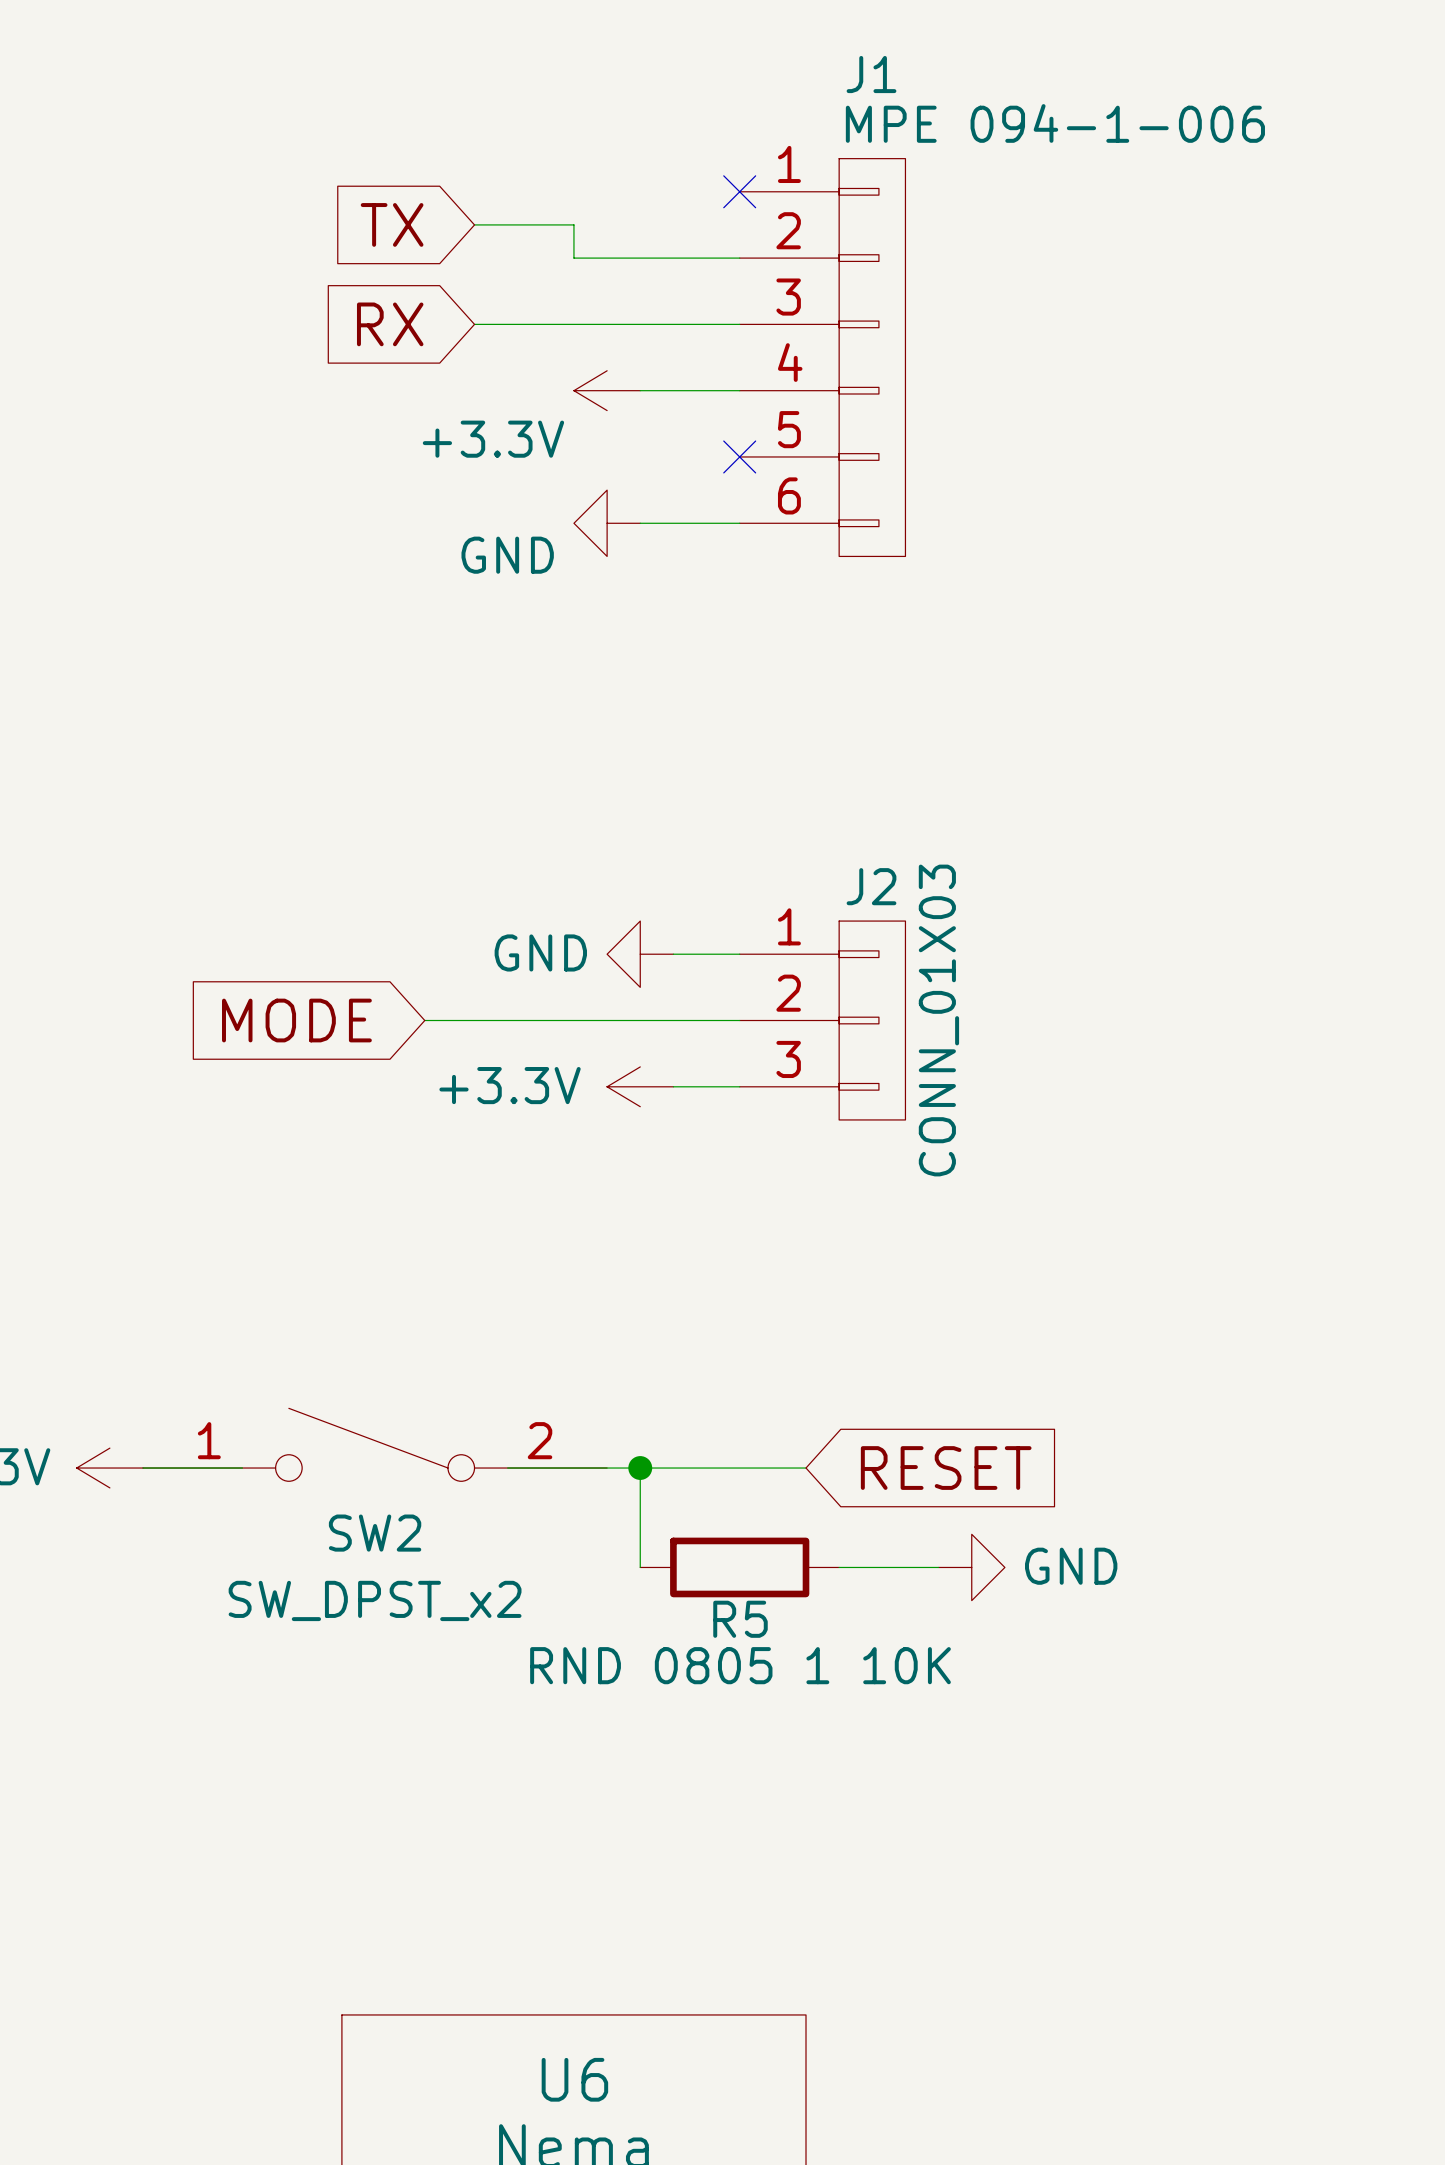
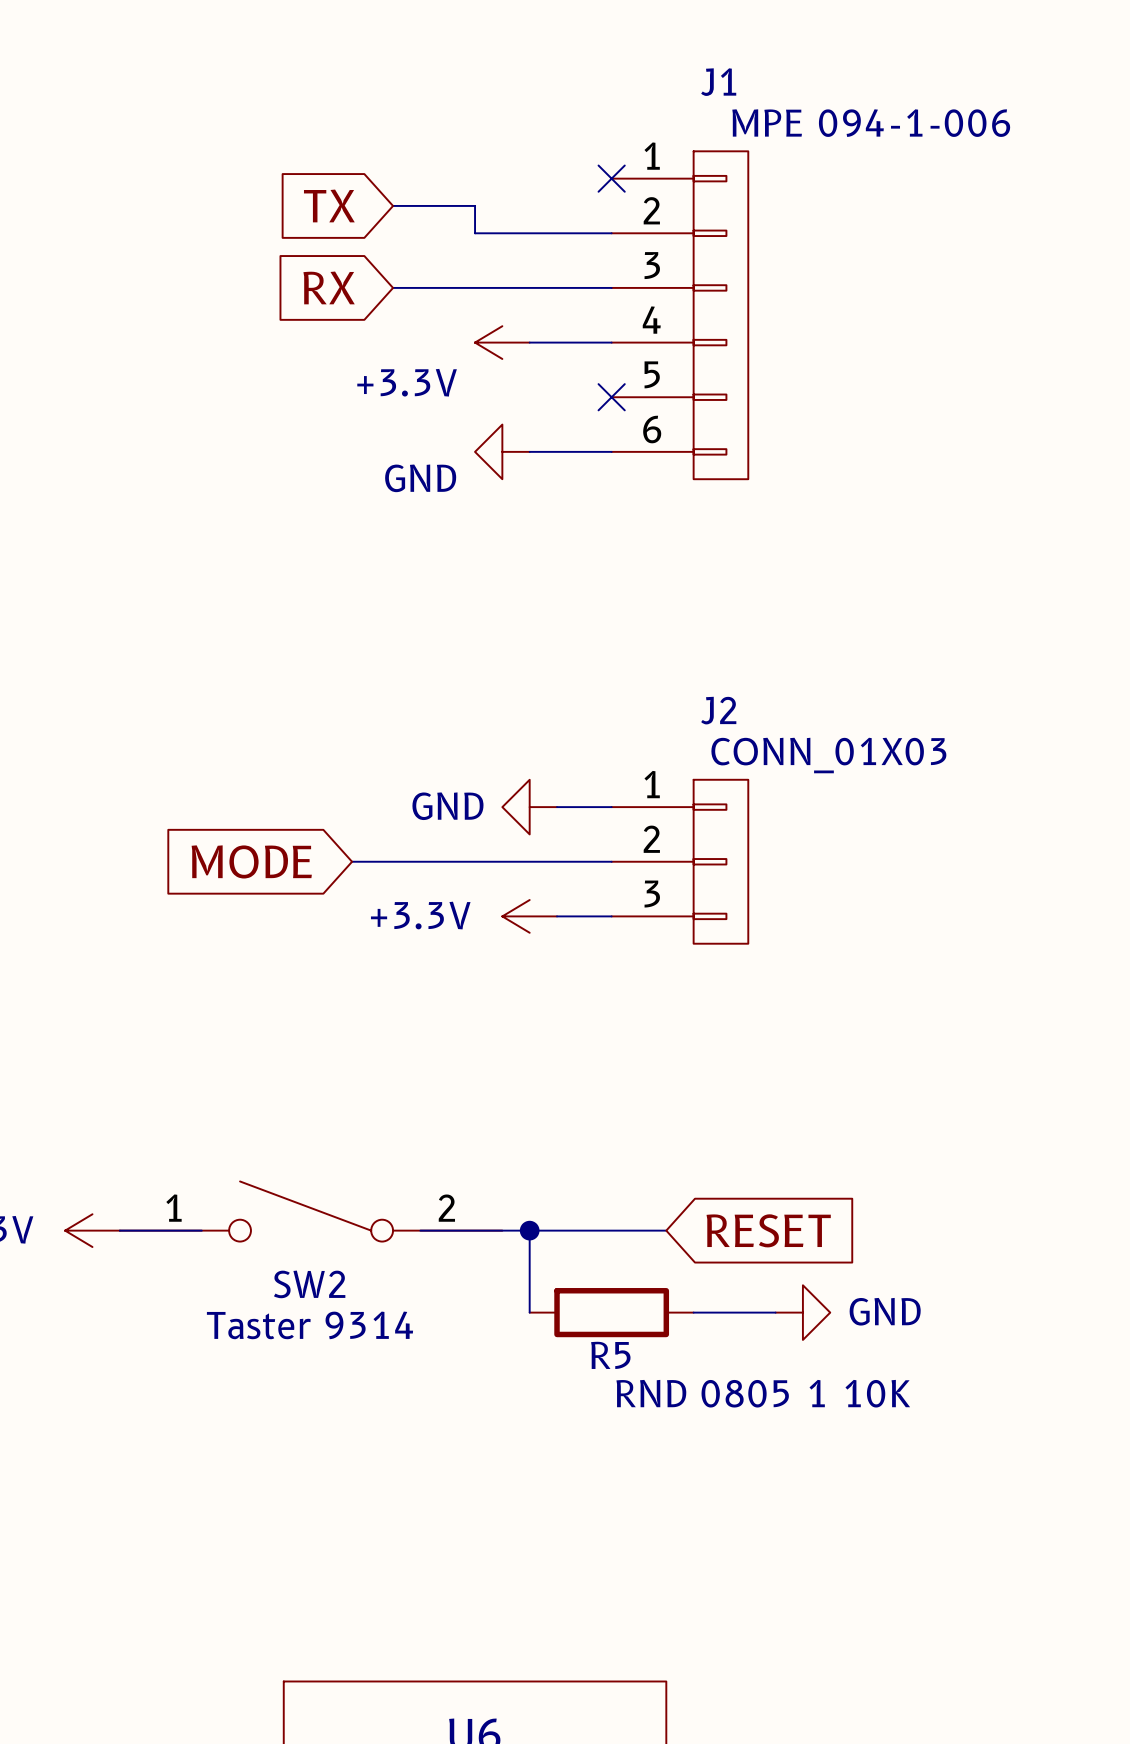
J2 name position: J2 (871, 886) -> J2 (718, 710)
J2 value rotation: 0° (938, 1020) -> 90° clockwise (828, 755)
SW2 value: SW_DPST_x2 (375, 1600) -> Taster 9314 (310, 1325)
R5 value position: RND 0805 1 10K (740, 1665) -> RND 0805 1 10K (763, 1393)

